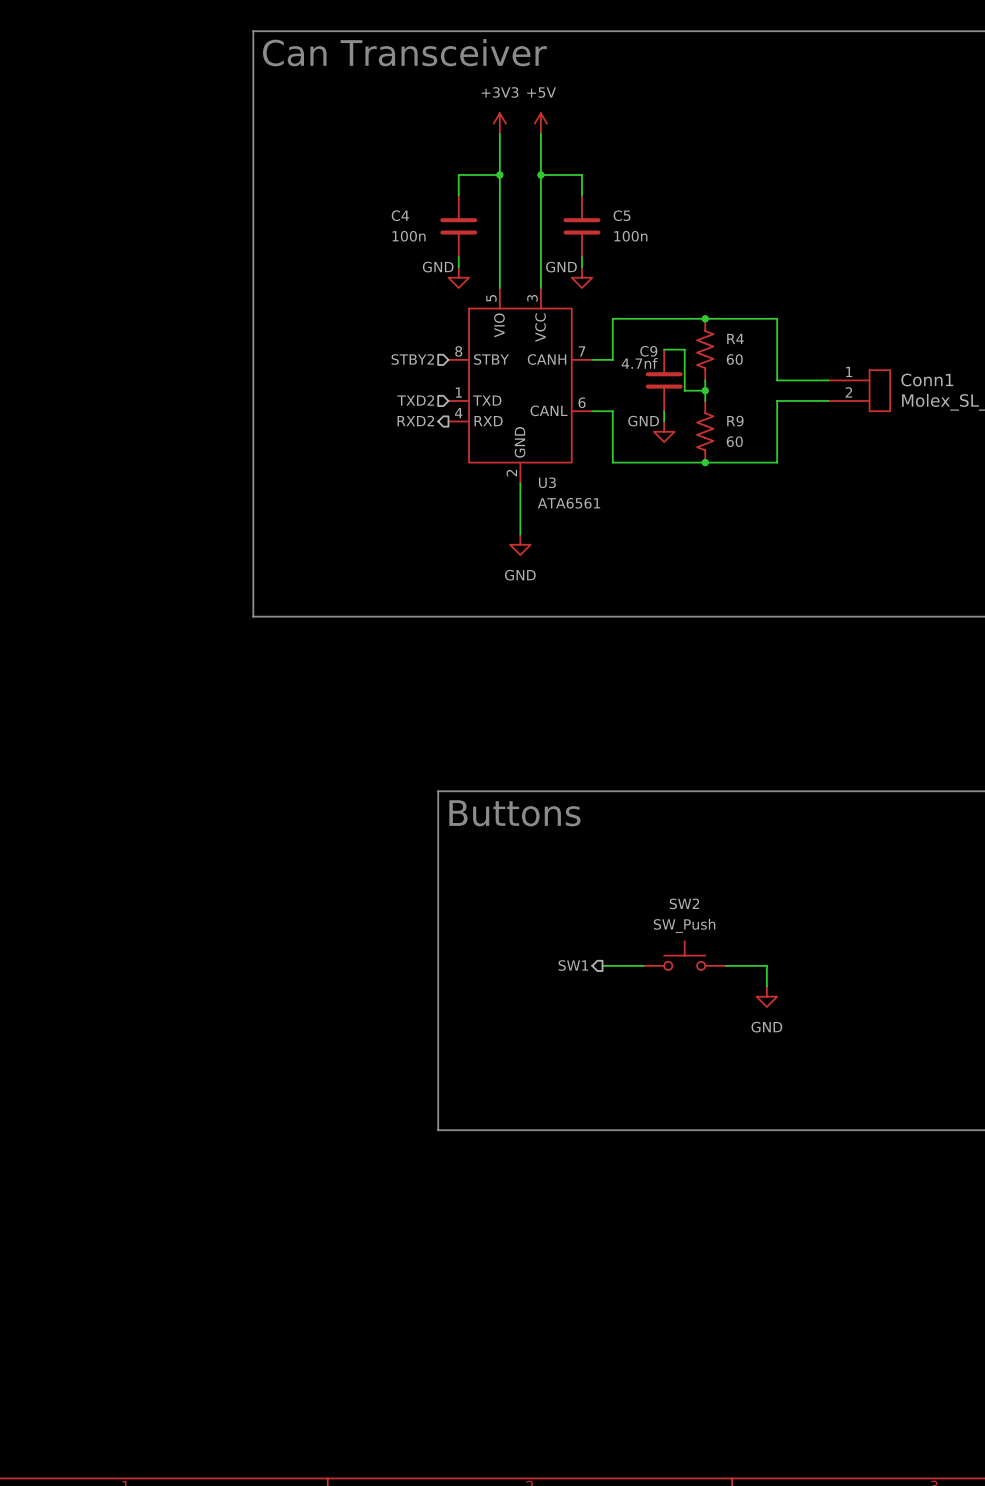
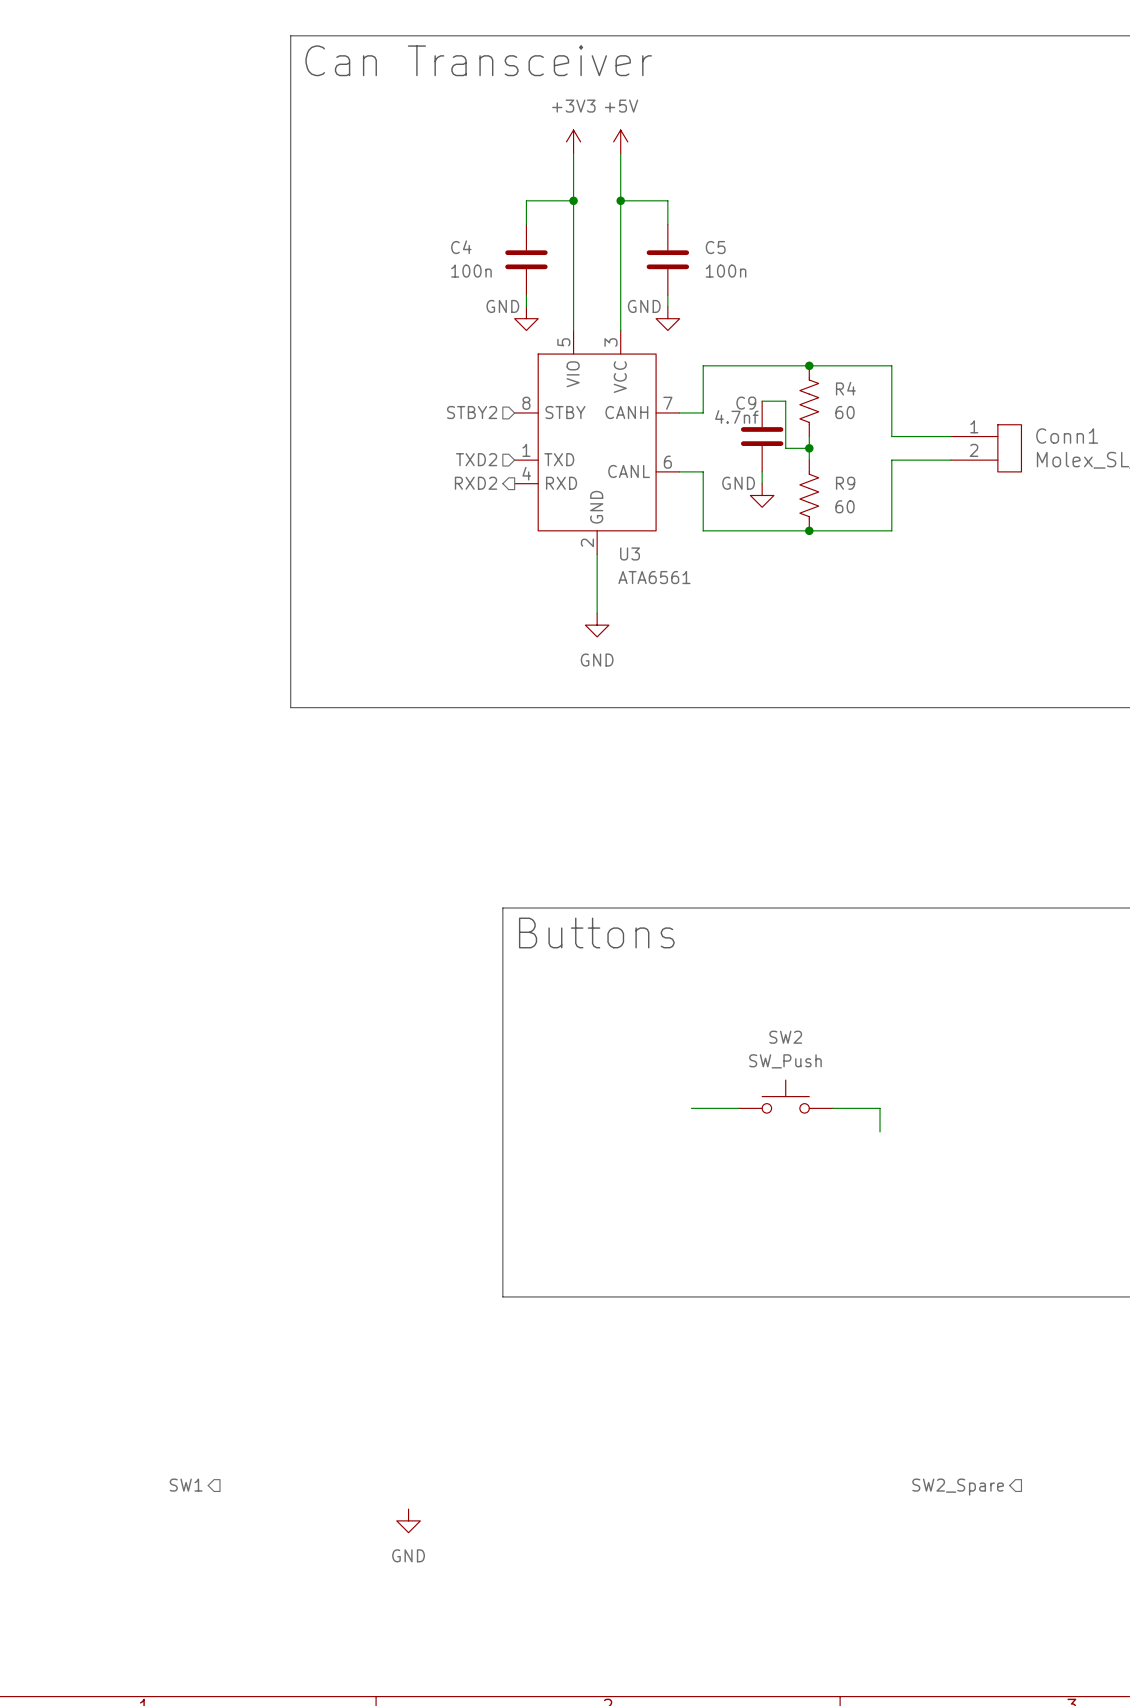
hierarchical label: SW1 (573, 965) -> none
power symbol: GND (766, 996) -> none
hierarchical label: none -> SW1 (186, 1485)
hierarchical label: none -> SW2_Spare (958, 1487)
power symbol: none -> GND (408, 1520)

